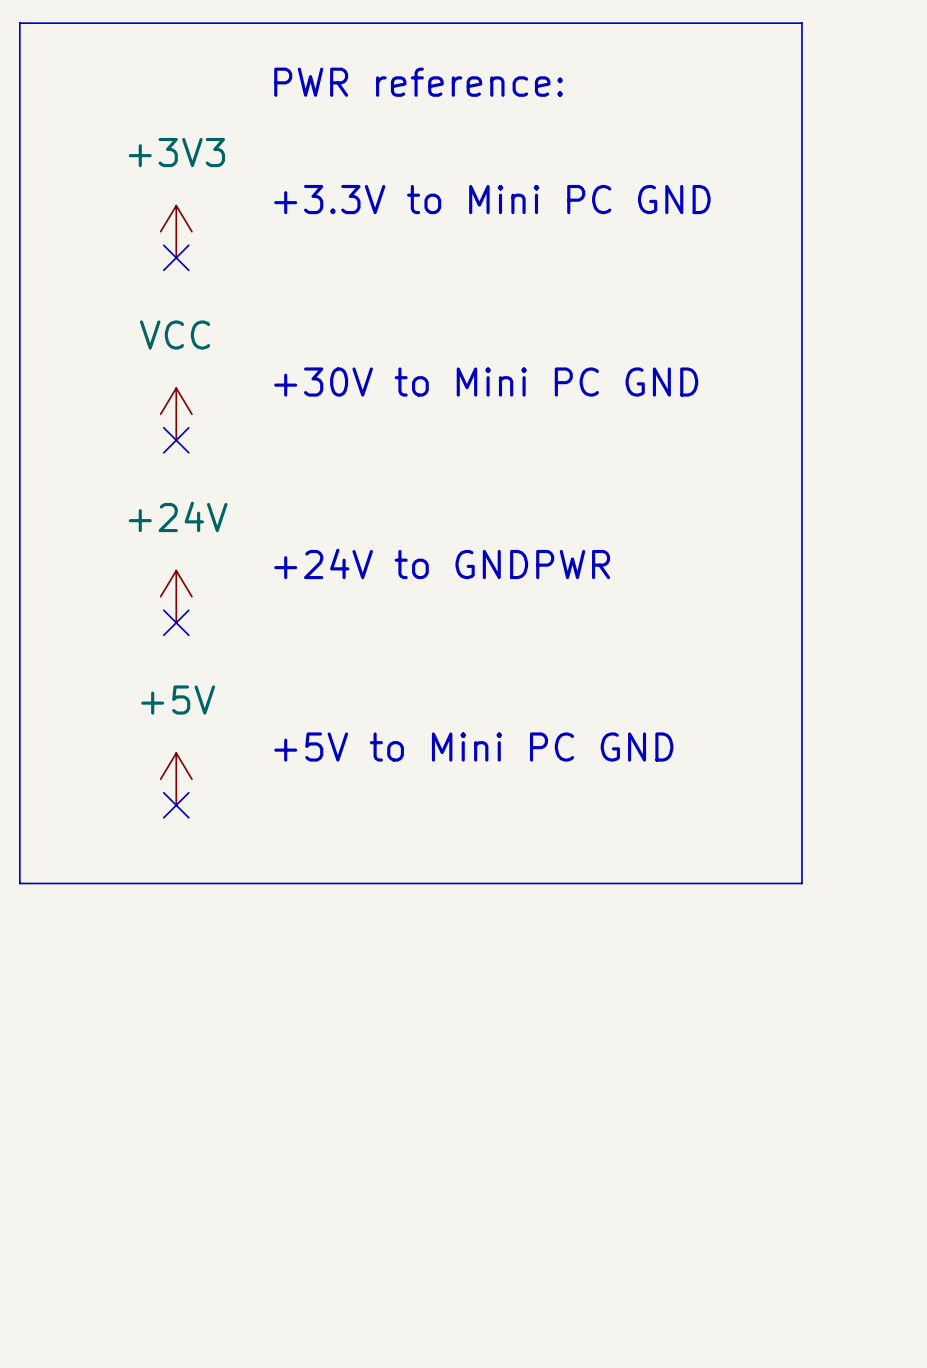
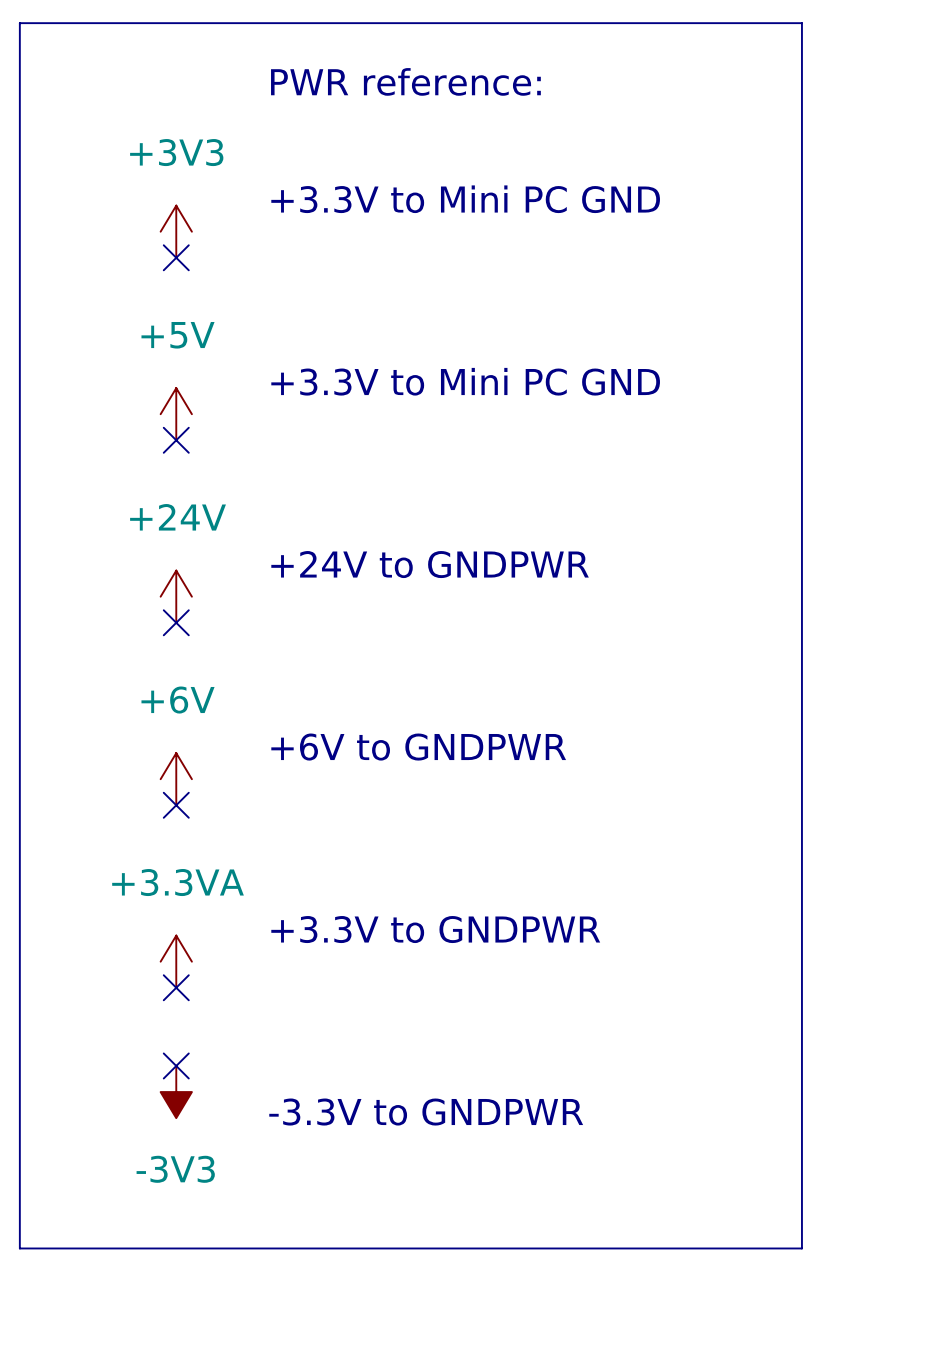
text: +30V to Mini PC GND (486, 382) -> +3.3V to Mini PC GND (465, 381)
power symbol: VCC (176, 414) -> +5V (176, 414)
text: +5V to Mini PC GND (473, 747) -> +6V to GNDPWR (418, 747)
power symbol: +5V (176, 779) -> +6V (176, 779)
line: (19, 883) (801, 883) -> (19, 883) (19, 1248) (801, 1248) (801, 883)
text: none -> +3.3V to GNDPWR (435, 929)
power symbol: none -> +3.3VA (176, 961)
no-connect mark: none -> (176, 987)
no-connect mark: none -> (176, 1065)
power symbol: none -> -3V3 (176, 1092)
text: none -> -3.3V to GNDPWR (426, 1112)

